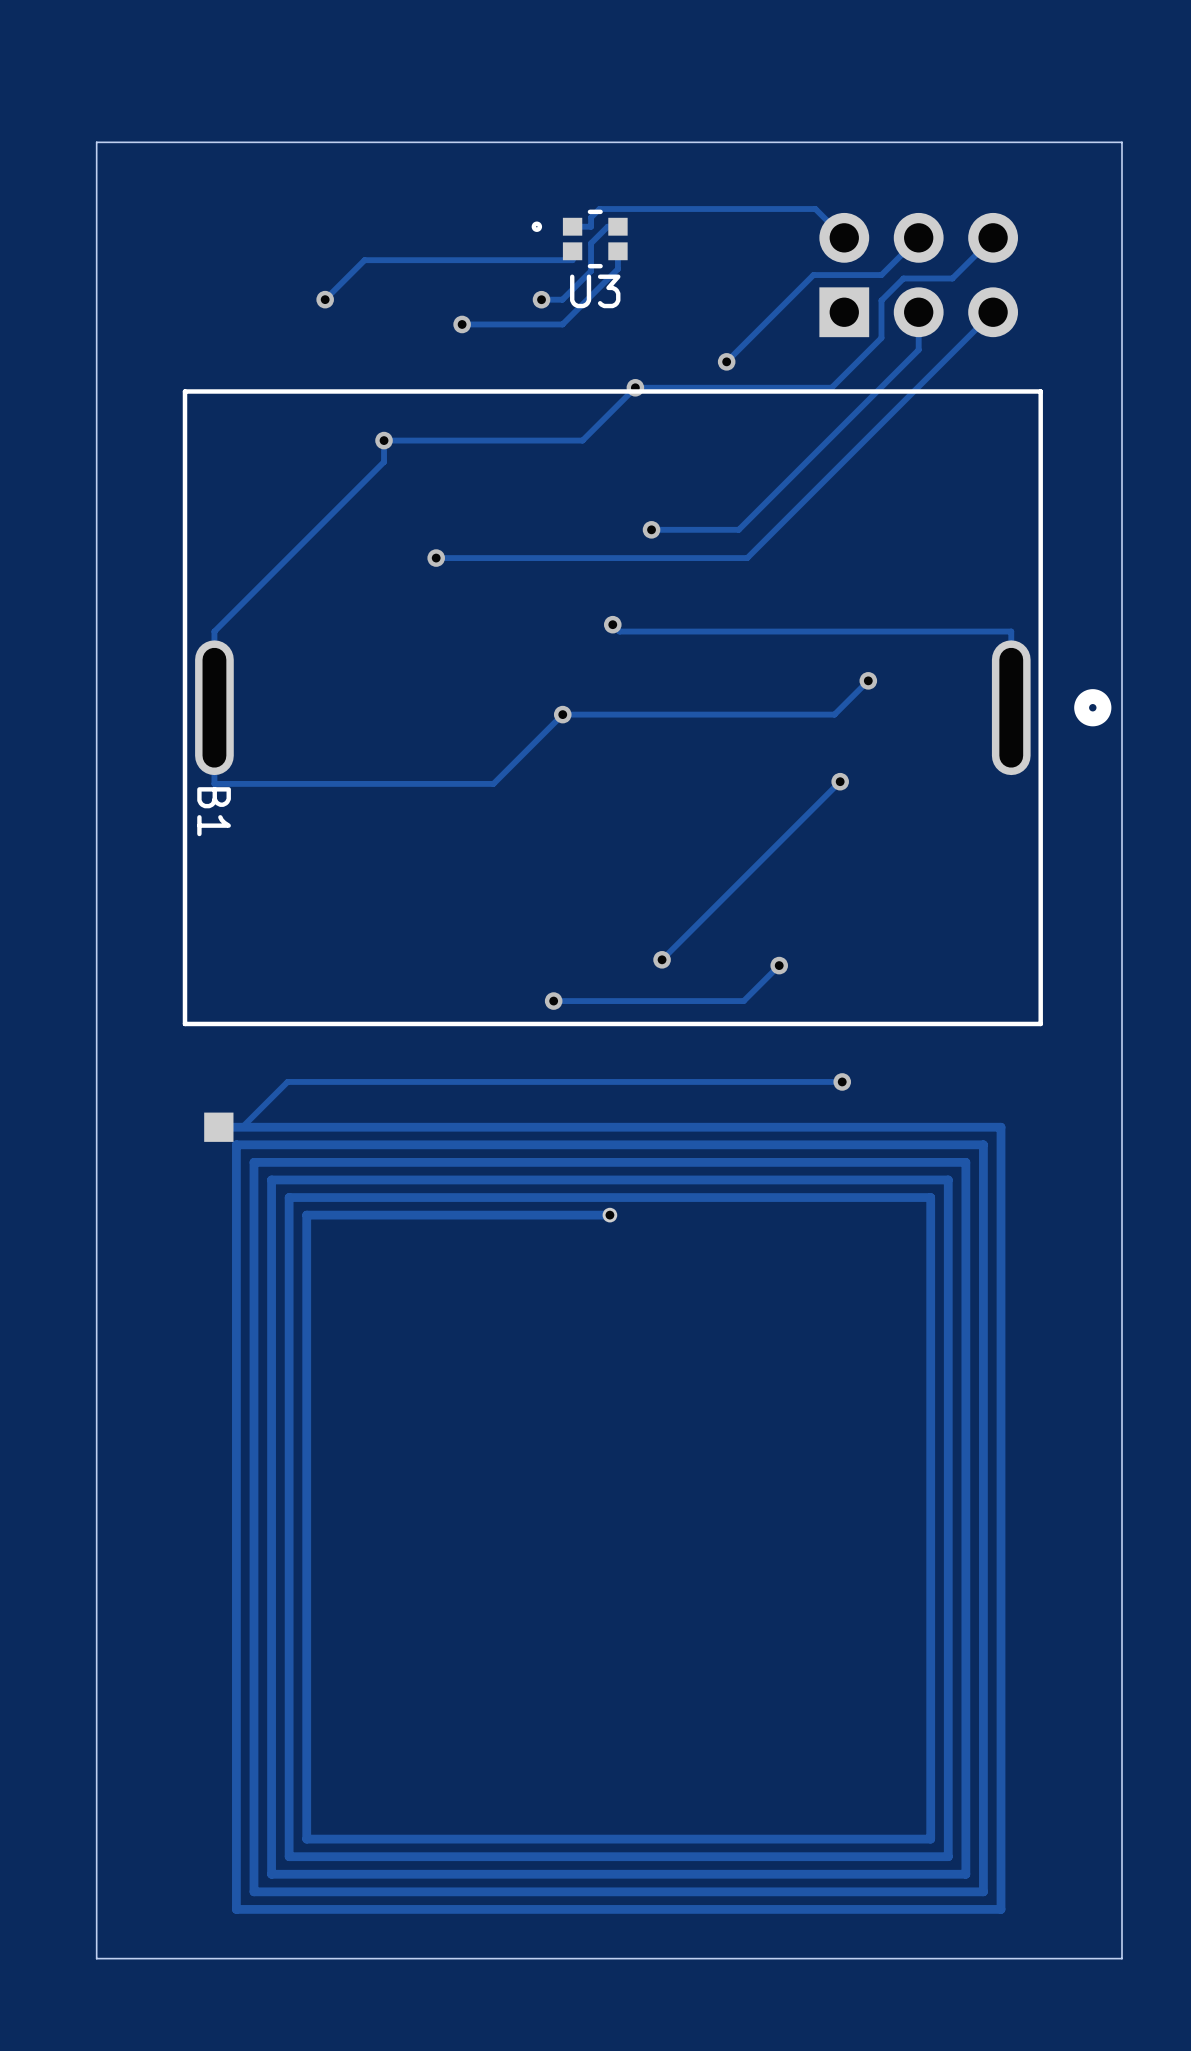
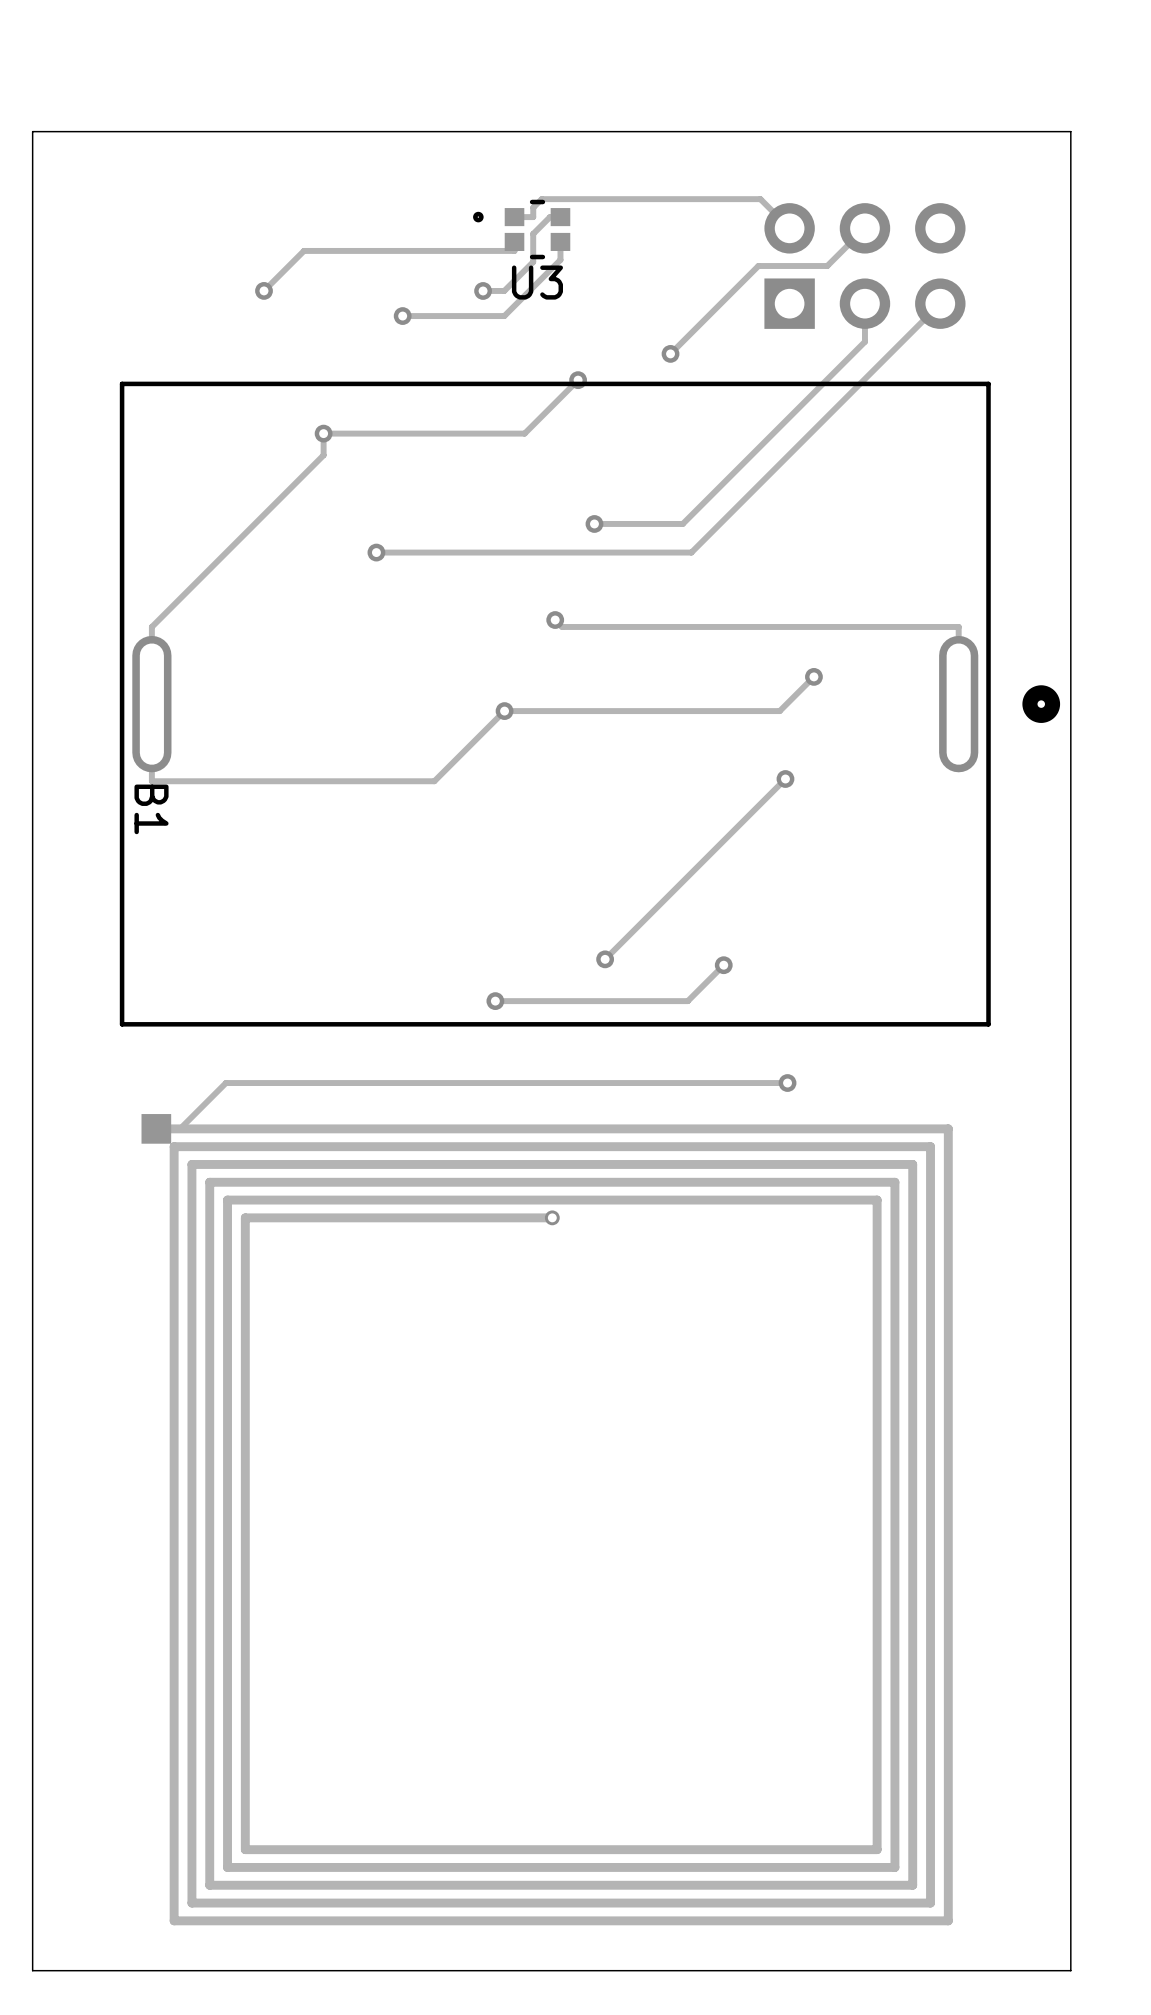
track: (993, 237) (952, 278) (903, 278) (881, 300) (881, 337) (831, 387) (635, 387) -> none

